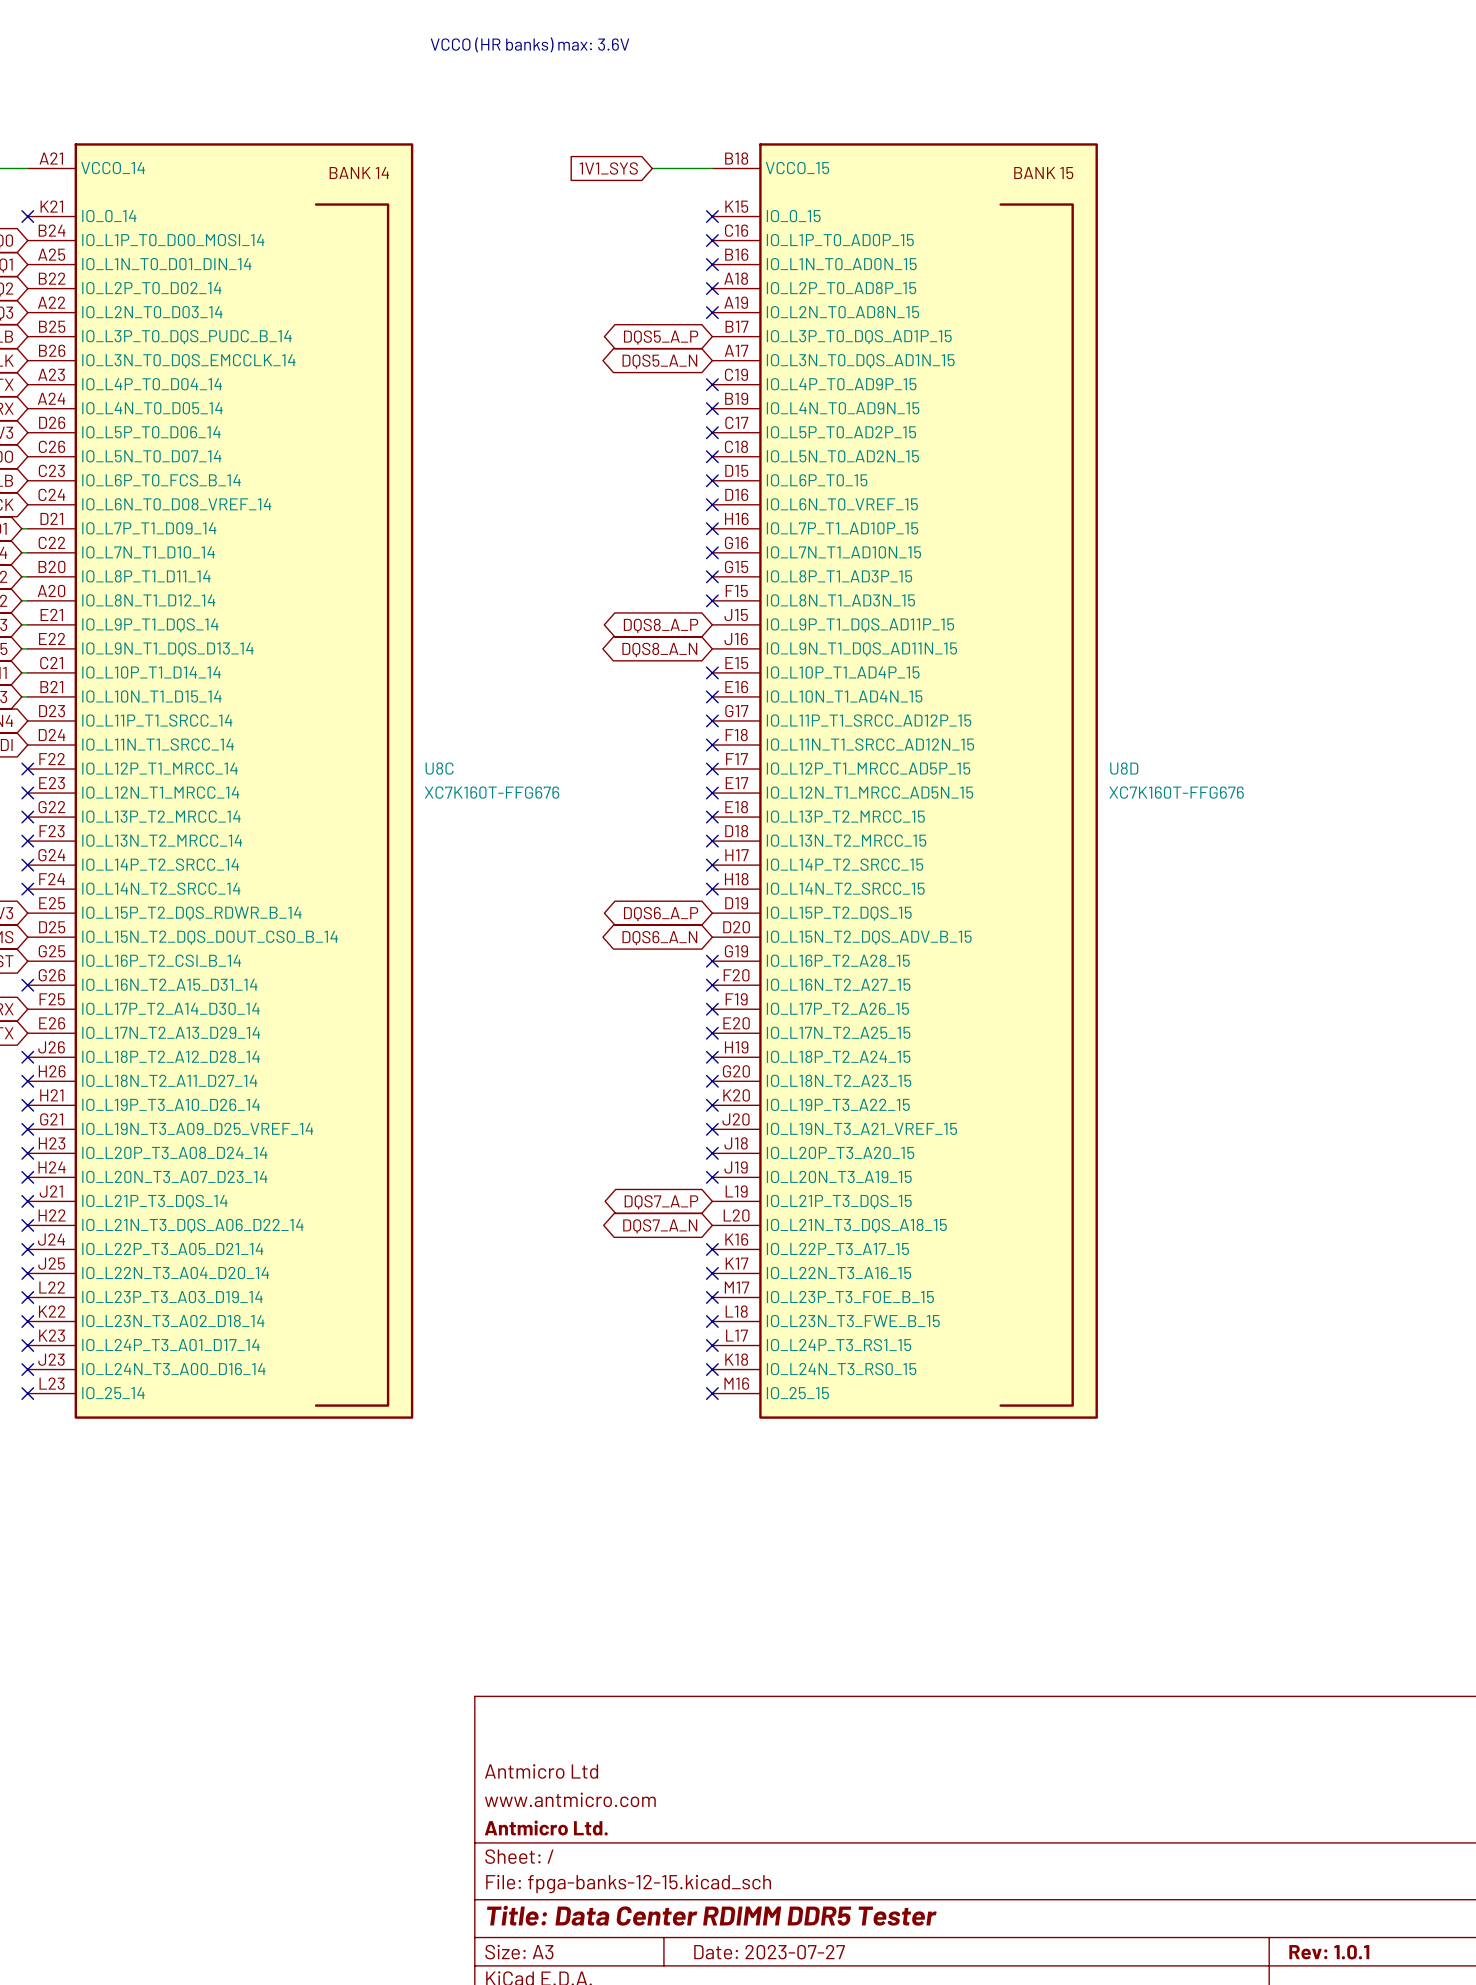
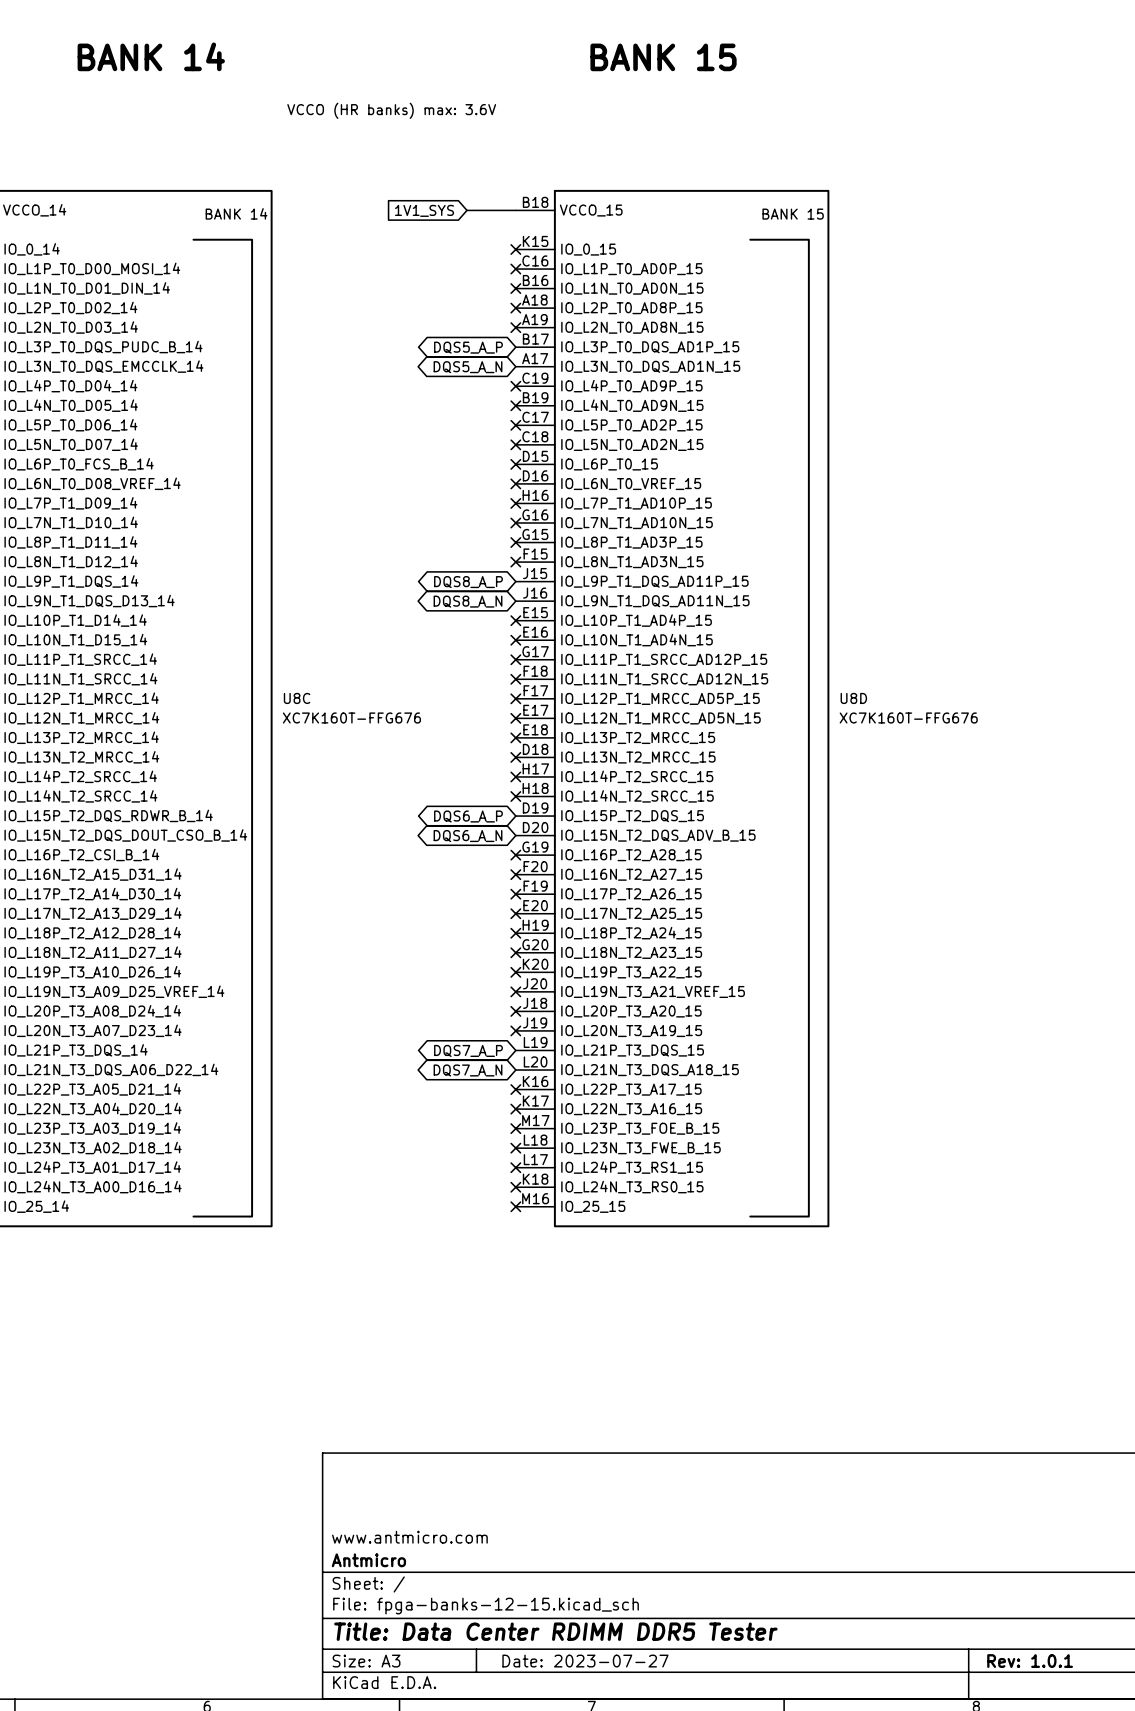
title block: Antmicro Ltd (541, 1771) -> none
title block: Antmicro Ltd. (546, 1828) -> Antmicro (368, 1560)

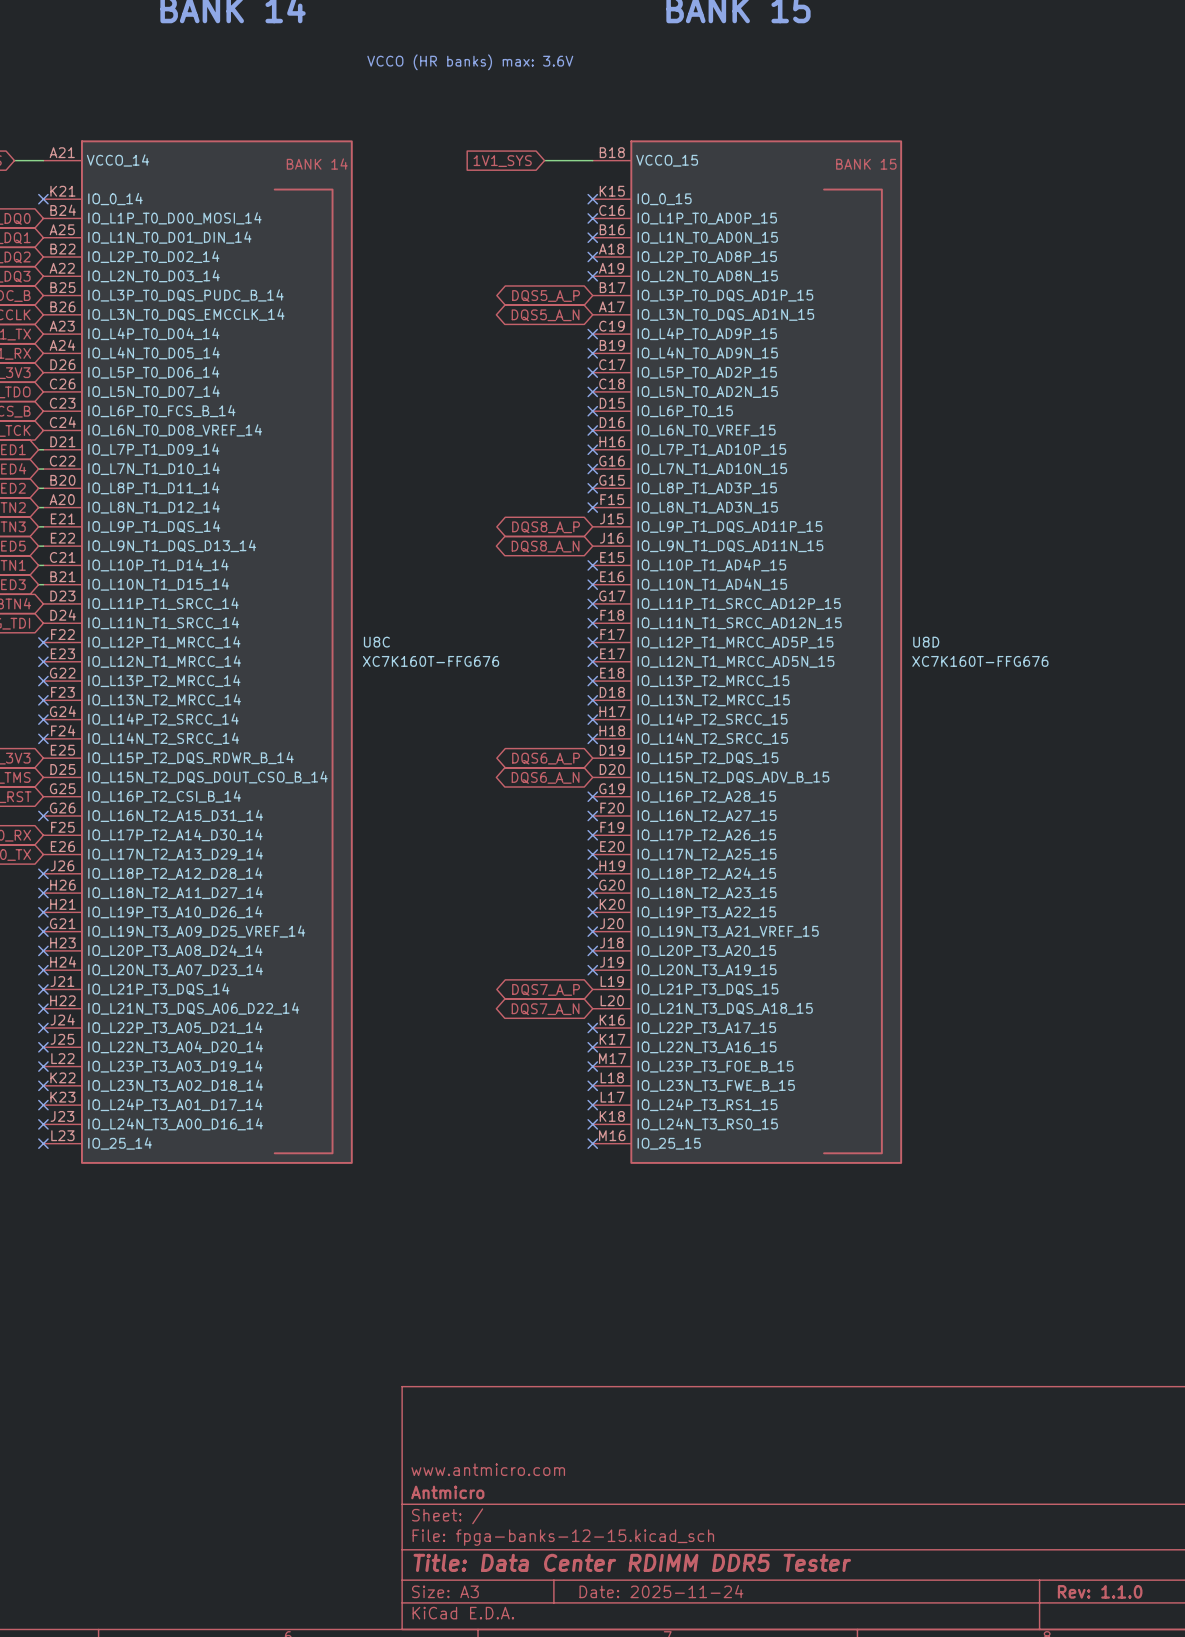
title block: Date: 2023-07-27 (585, 1661) -> Date: 2025-11-24 (661, 1591)
title block: Rev: 1.0.1 (1030, 1661) -> Rev: 1.1.0 (1100, 1591)

